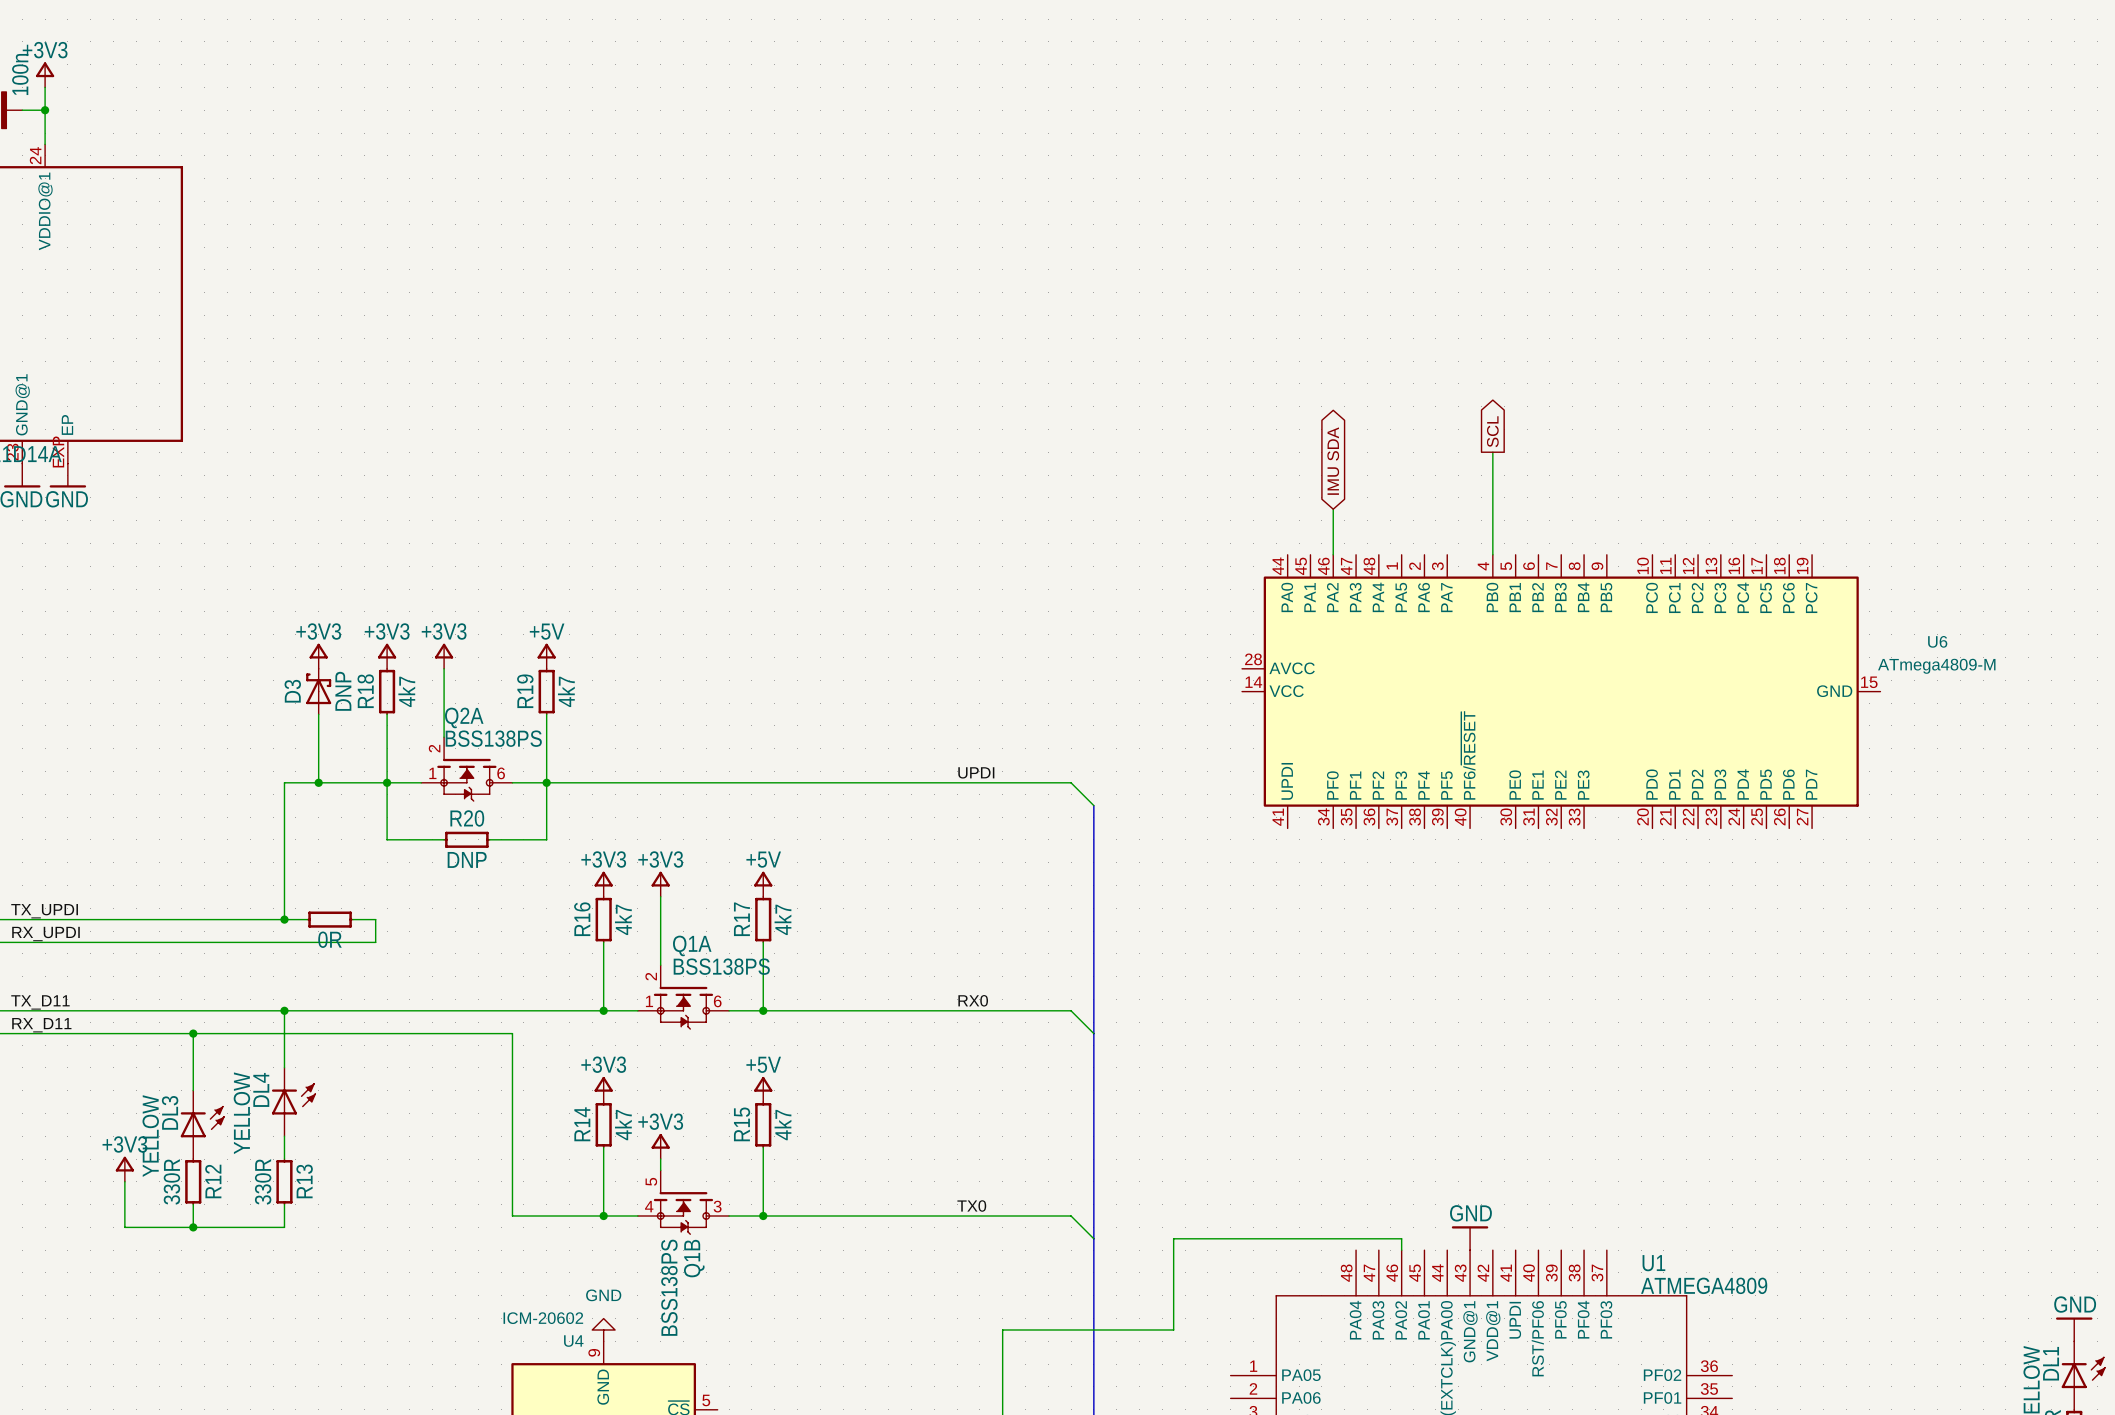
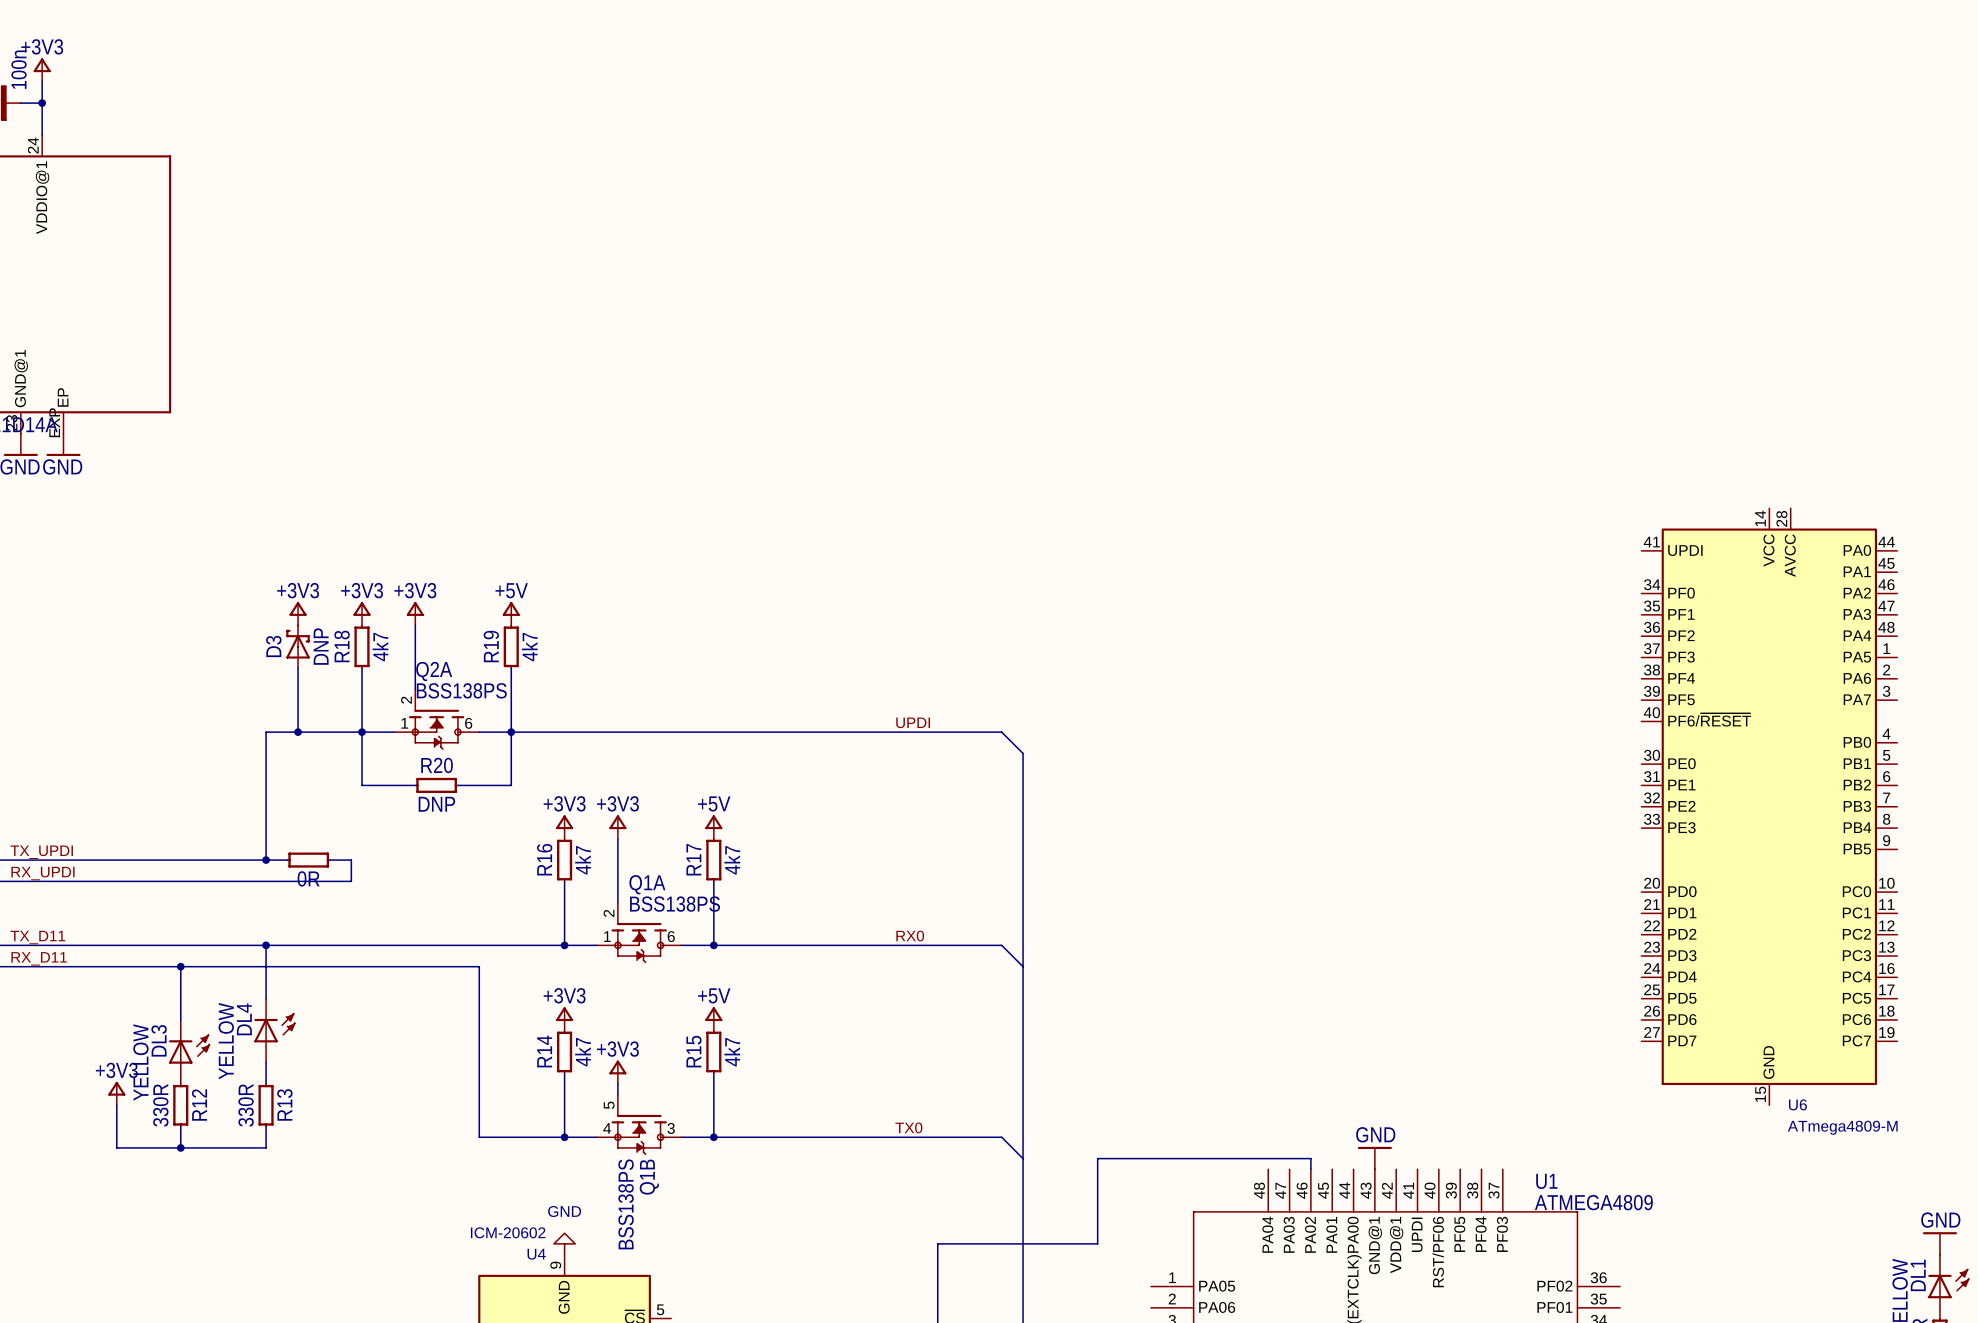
global label: SCL (1492, 431) -> none
wire: (1492, 452) (1492, 554) -> none
global label: IMU SDA (1333, 461) -> none
wire: (1333, 509) (1333, 554) -> none
U6 name position: U6 (1937, 641) -> U6 (1797, 1104)
U6 value position: ATmega4809-M (1936, 666) -> ATmega4809-M (1842, 1127)
U6 rotation: 0° (1561, 691) -> 90° clockwise (1769, 806)

